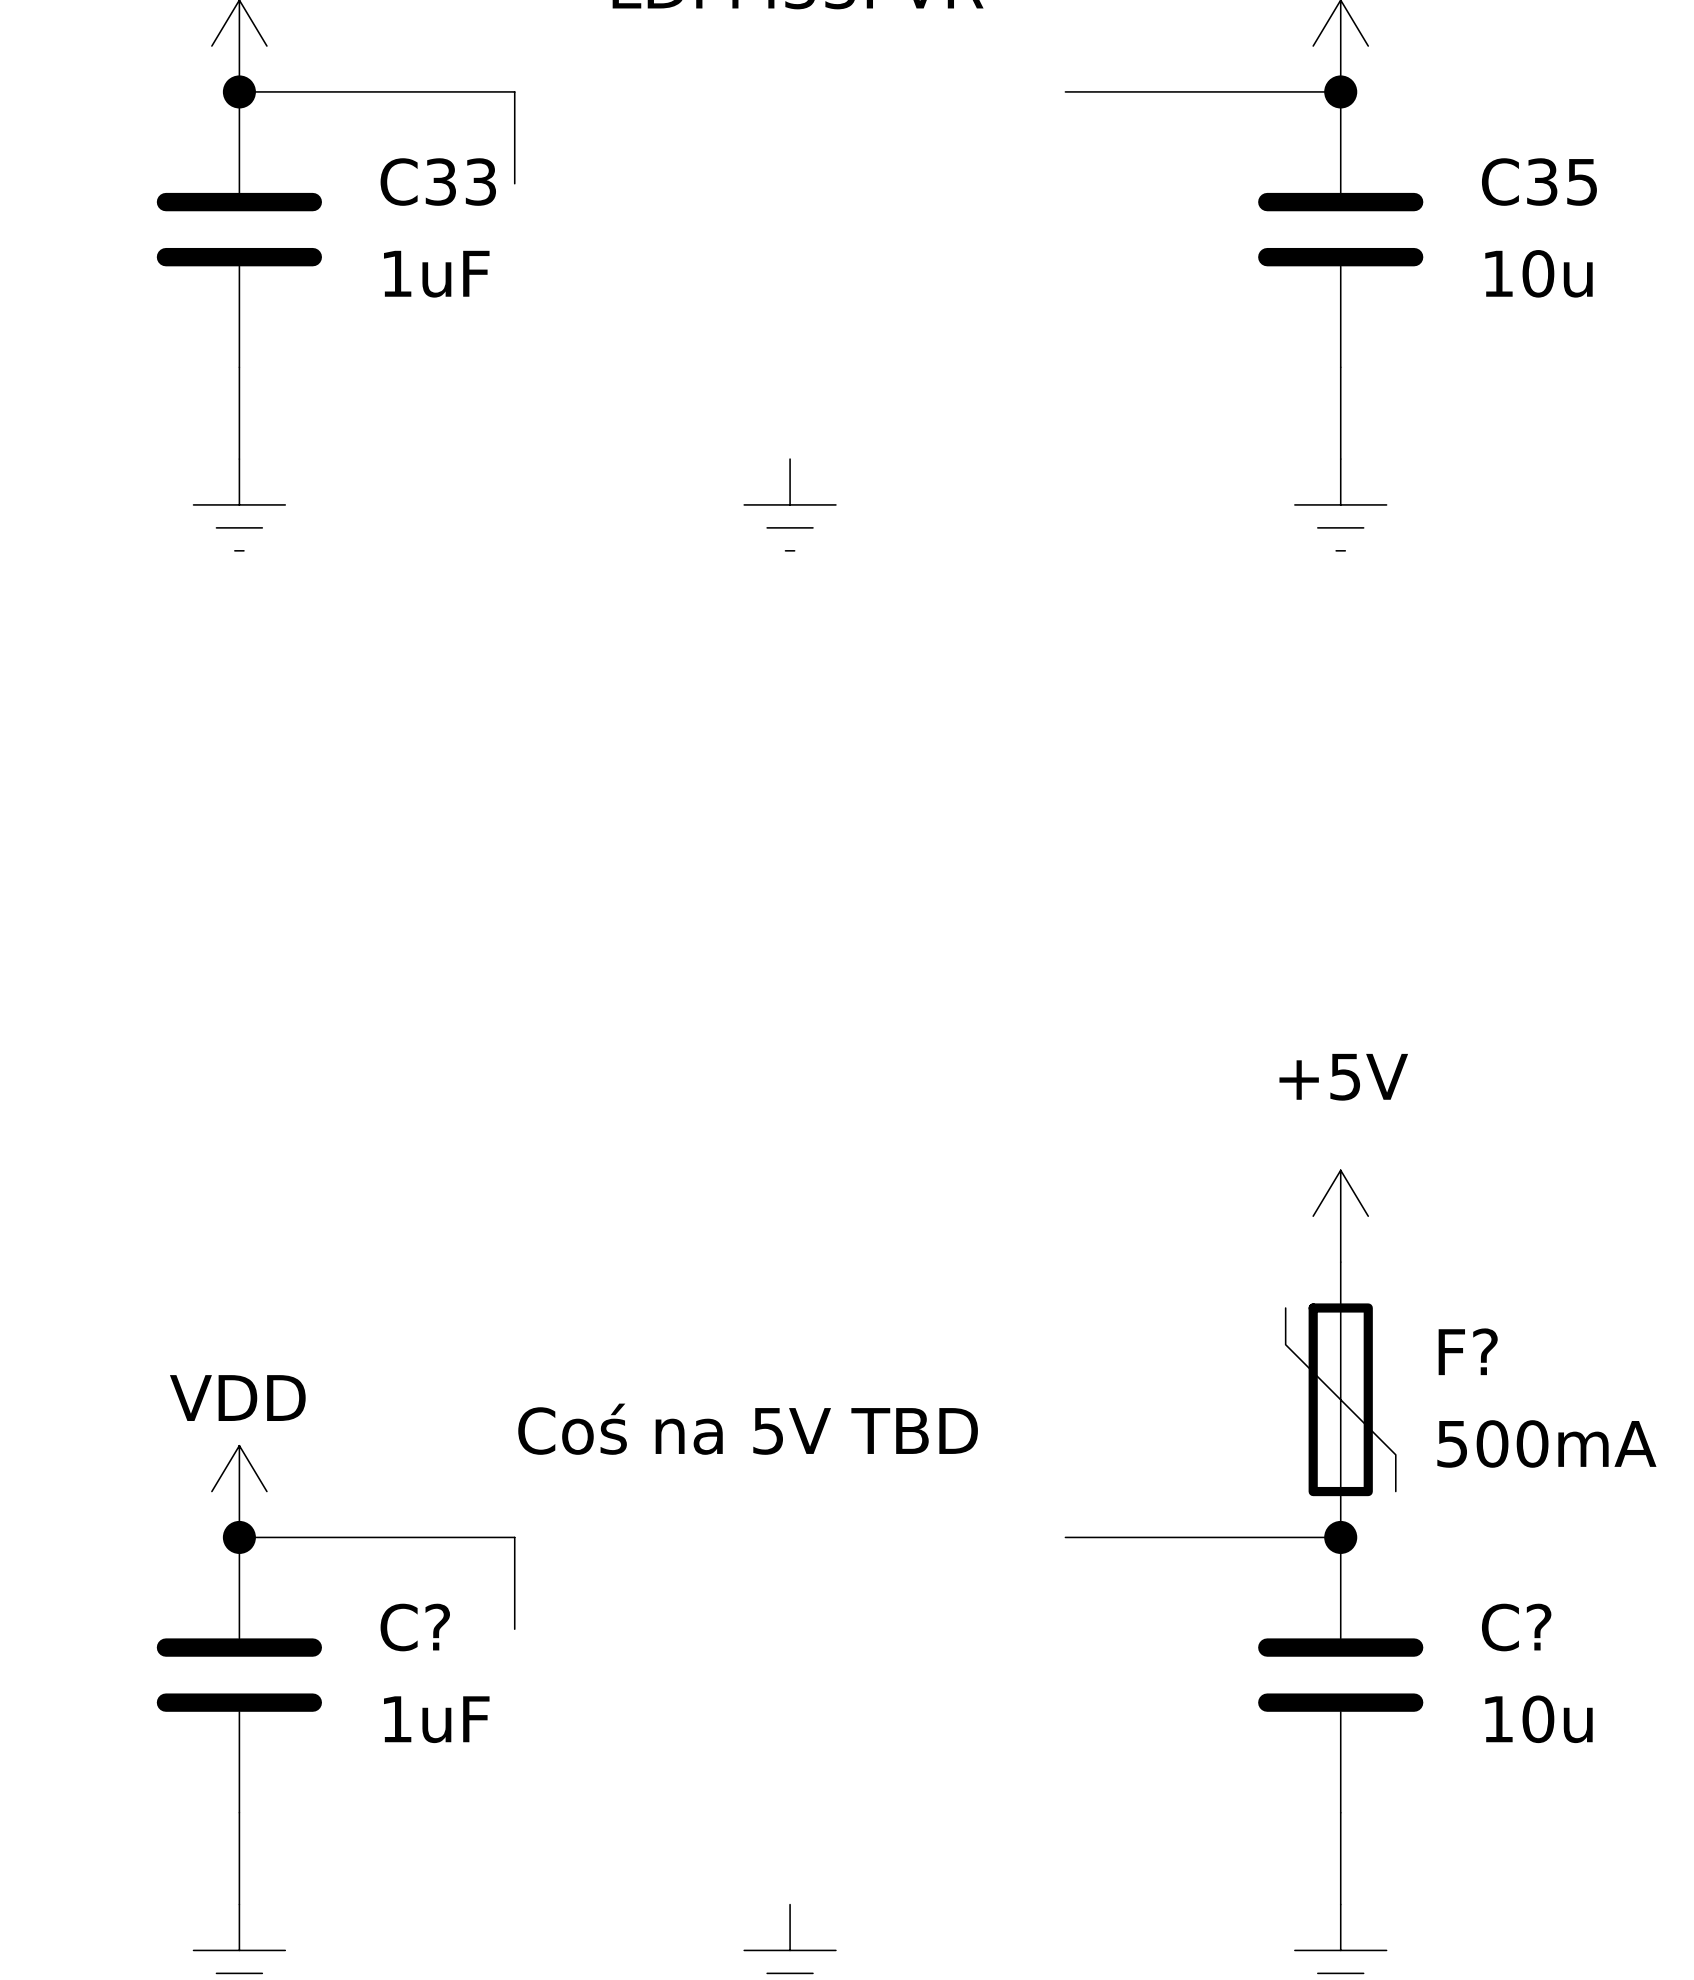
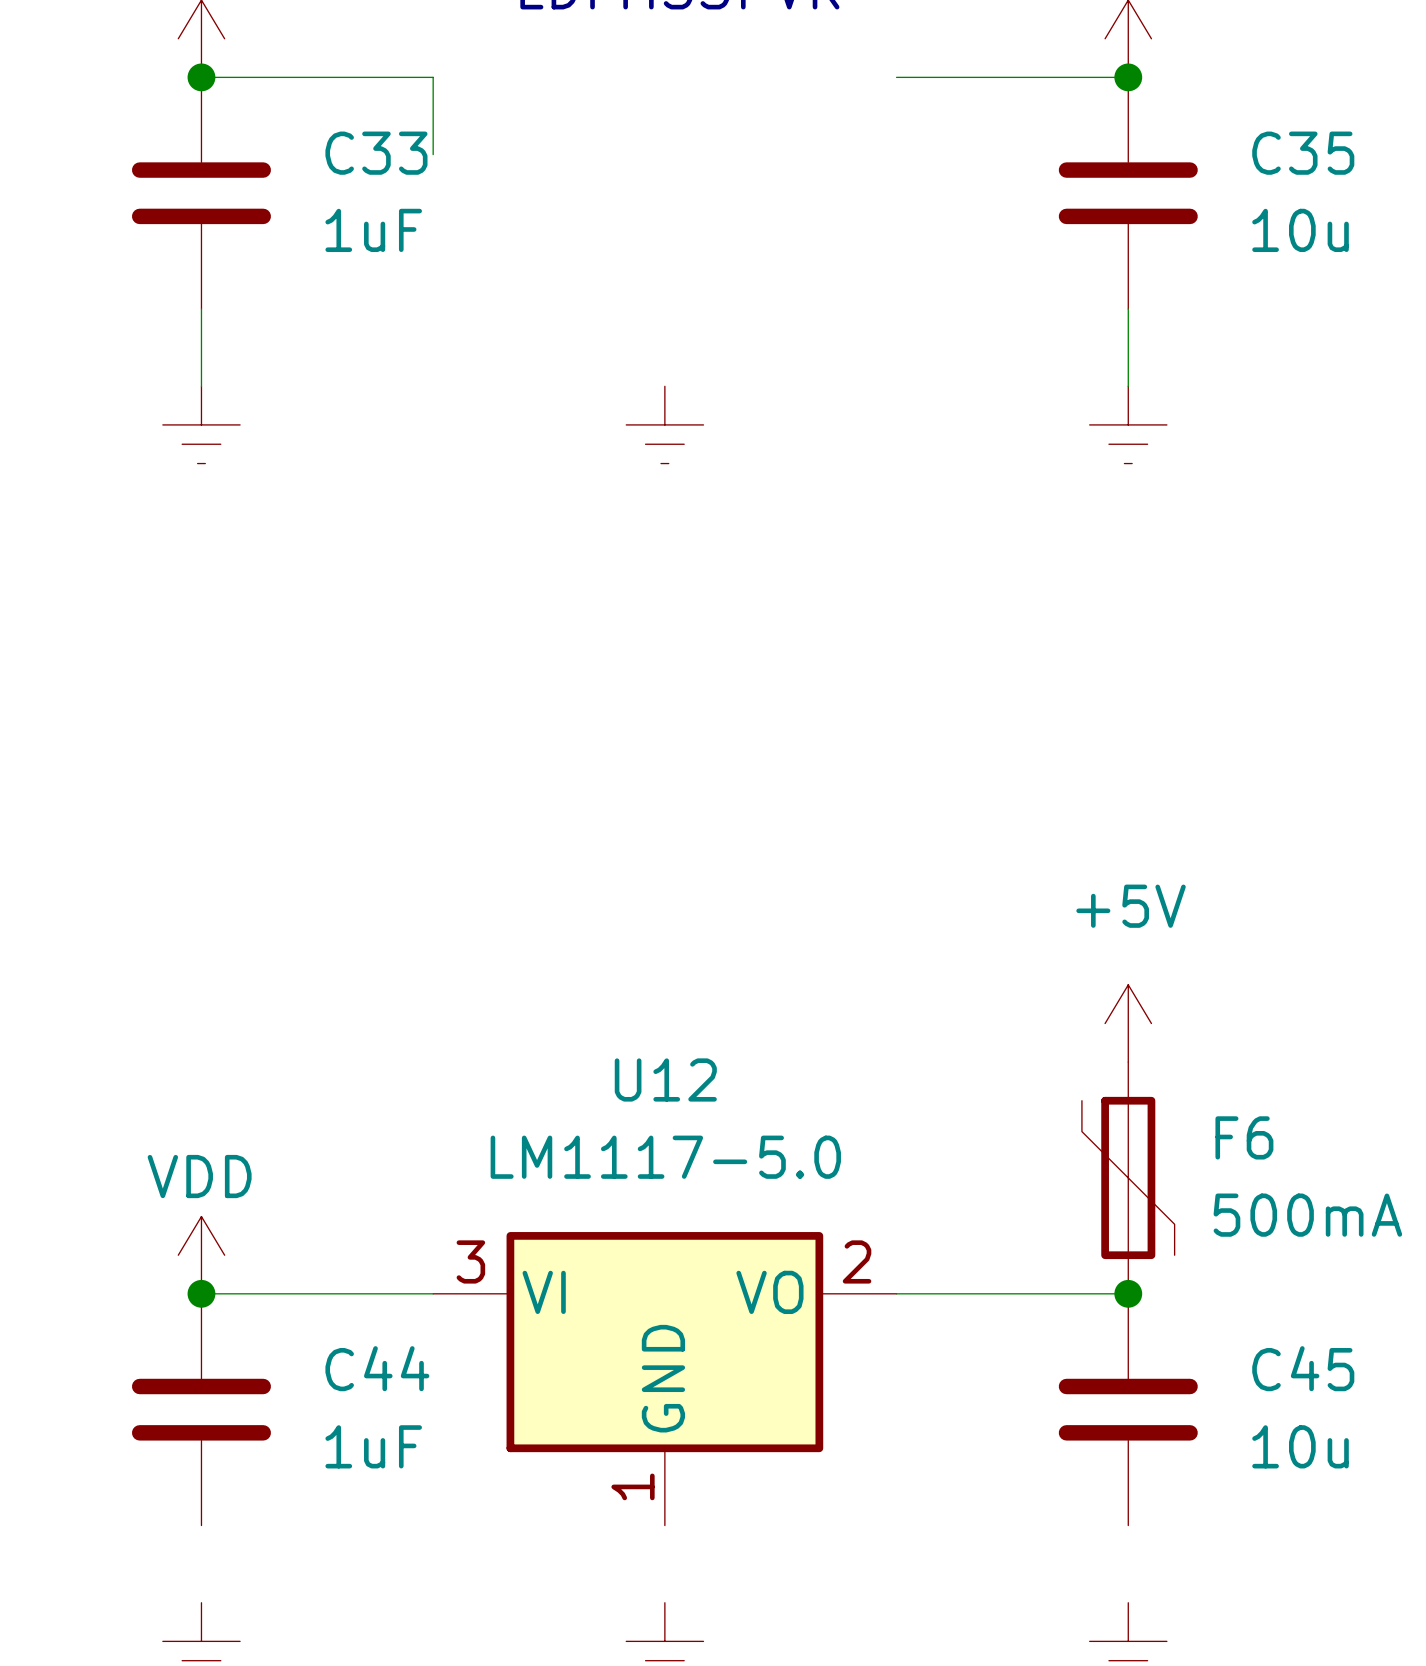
F? name: F? (1468, 1351) -> F6 (1244, 1137)
text: Coś na 5V TBD (748, 1429) -> none
wire: (514, 1537) (514, 1629) -> none
C? name: C? (415, 1627) -> C44 (377, 1368)
C? name: C? (1516, 1627) -> C45 (1303, 1368)
U12: none -> LM1117-5.0 (664, 1378)
wire: (239, 1812) (239, 1904) -> none
wire: (1340, 1812) (1340, 1904) -> none

